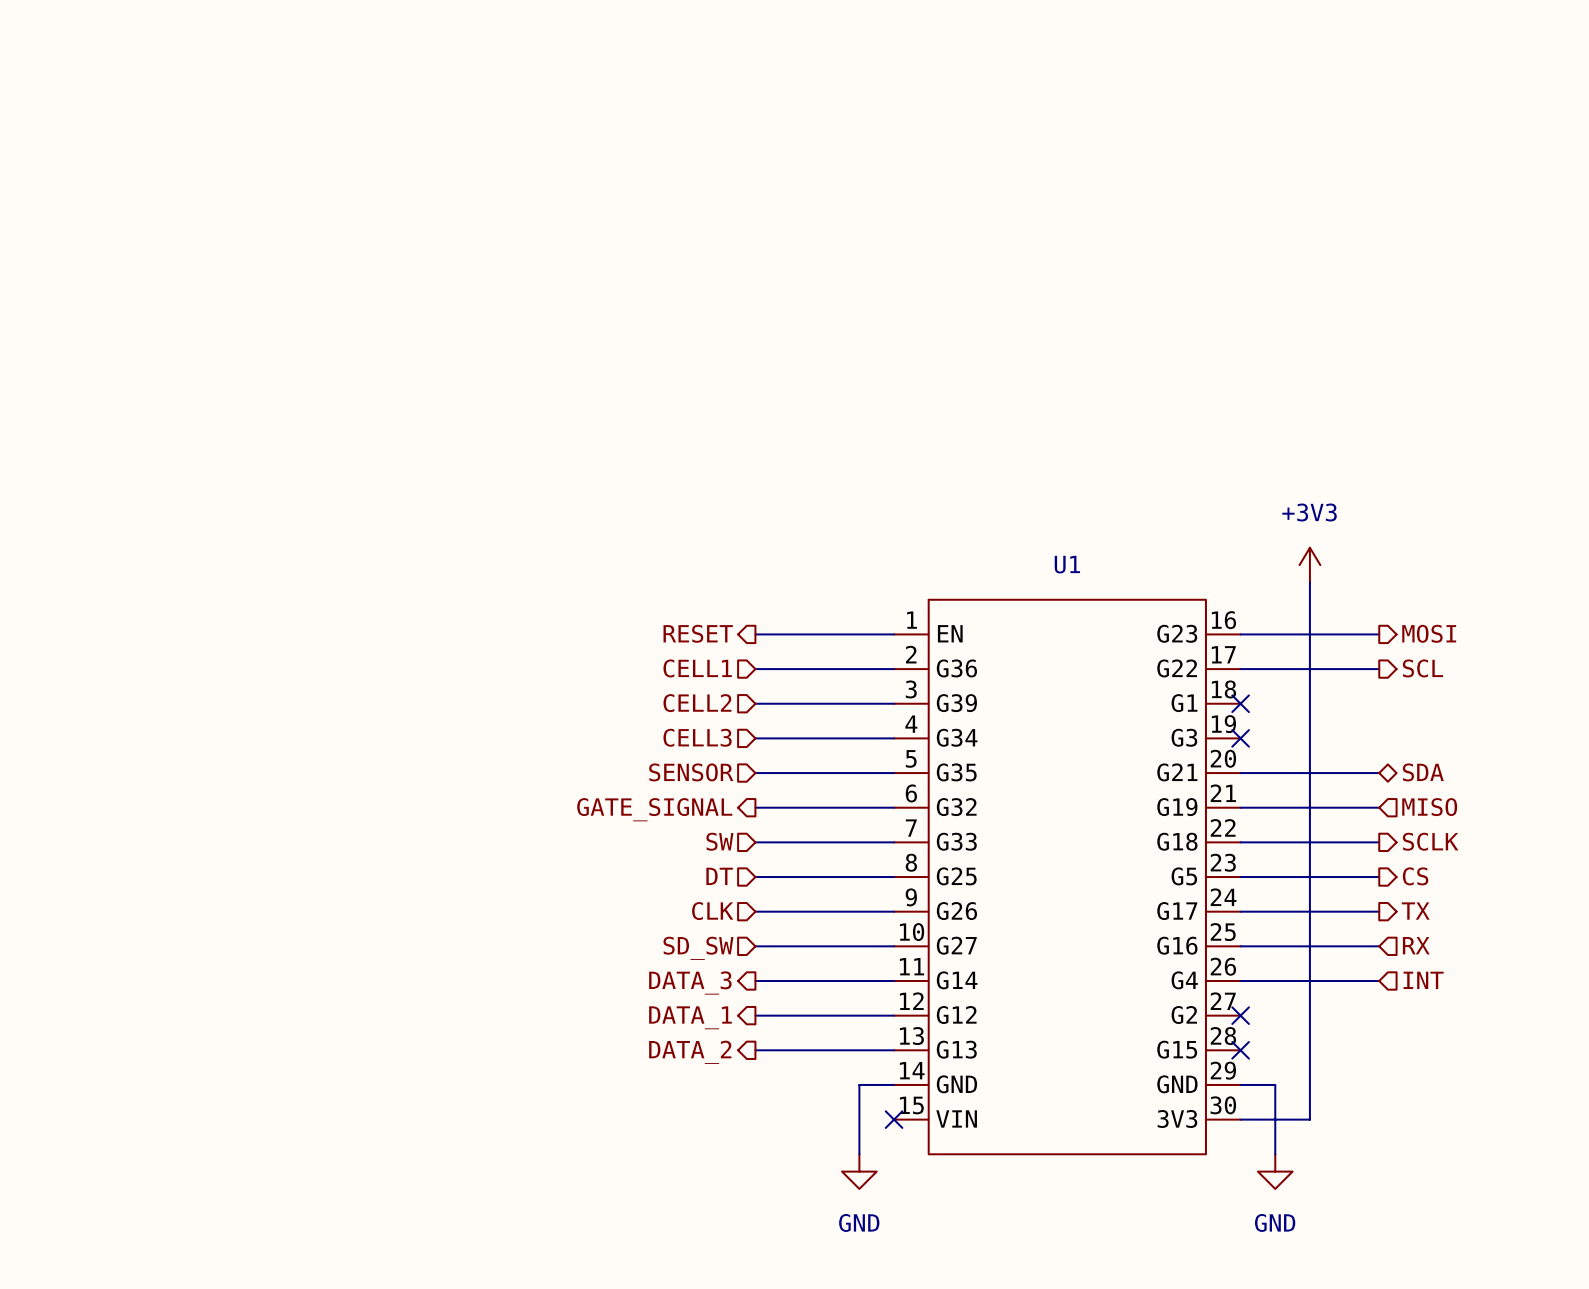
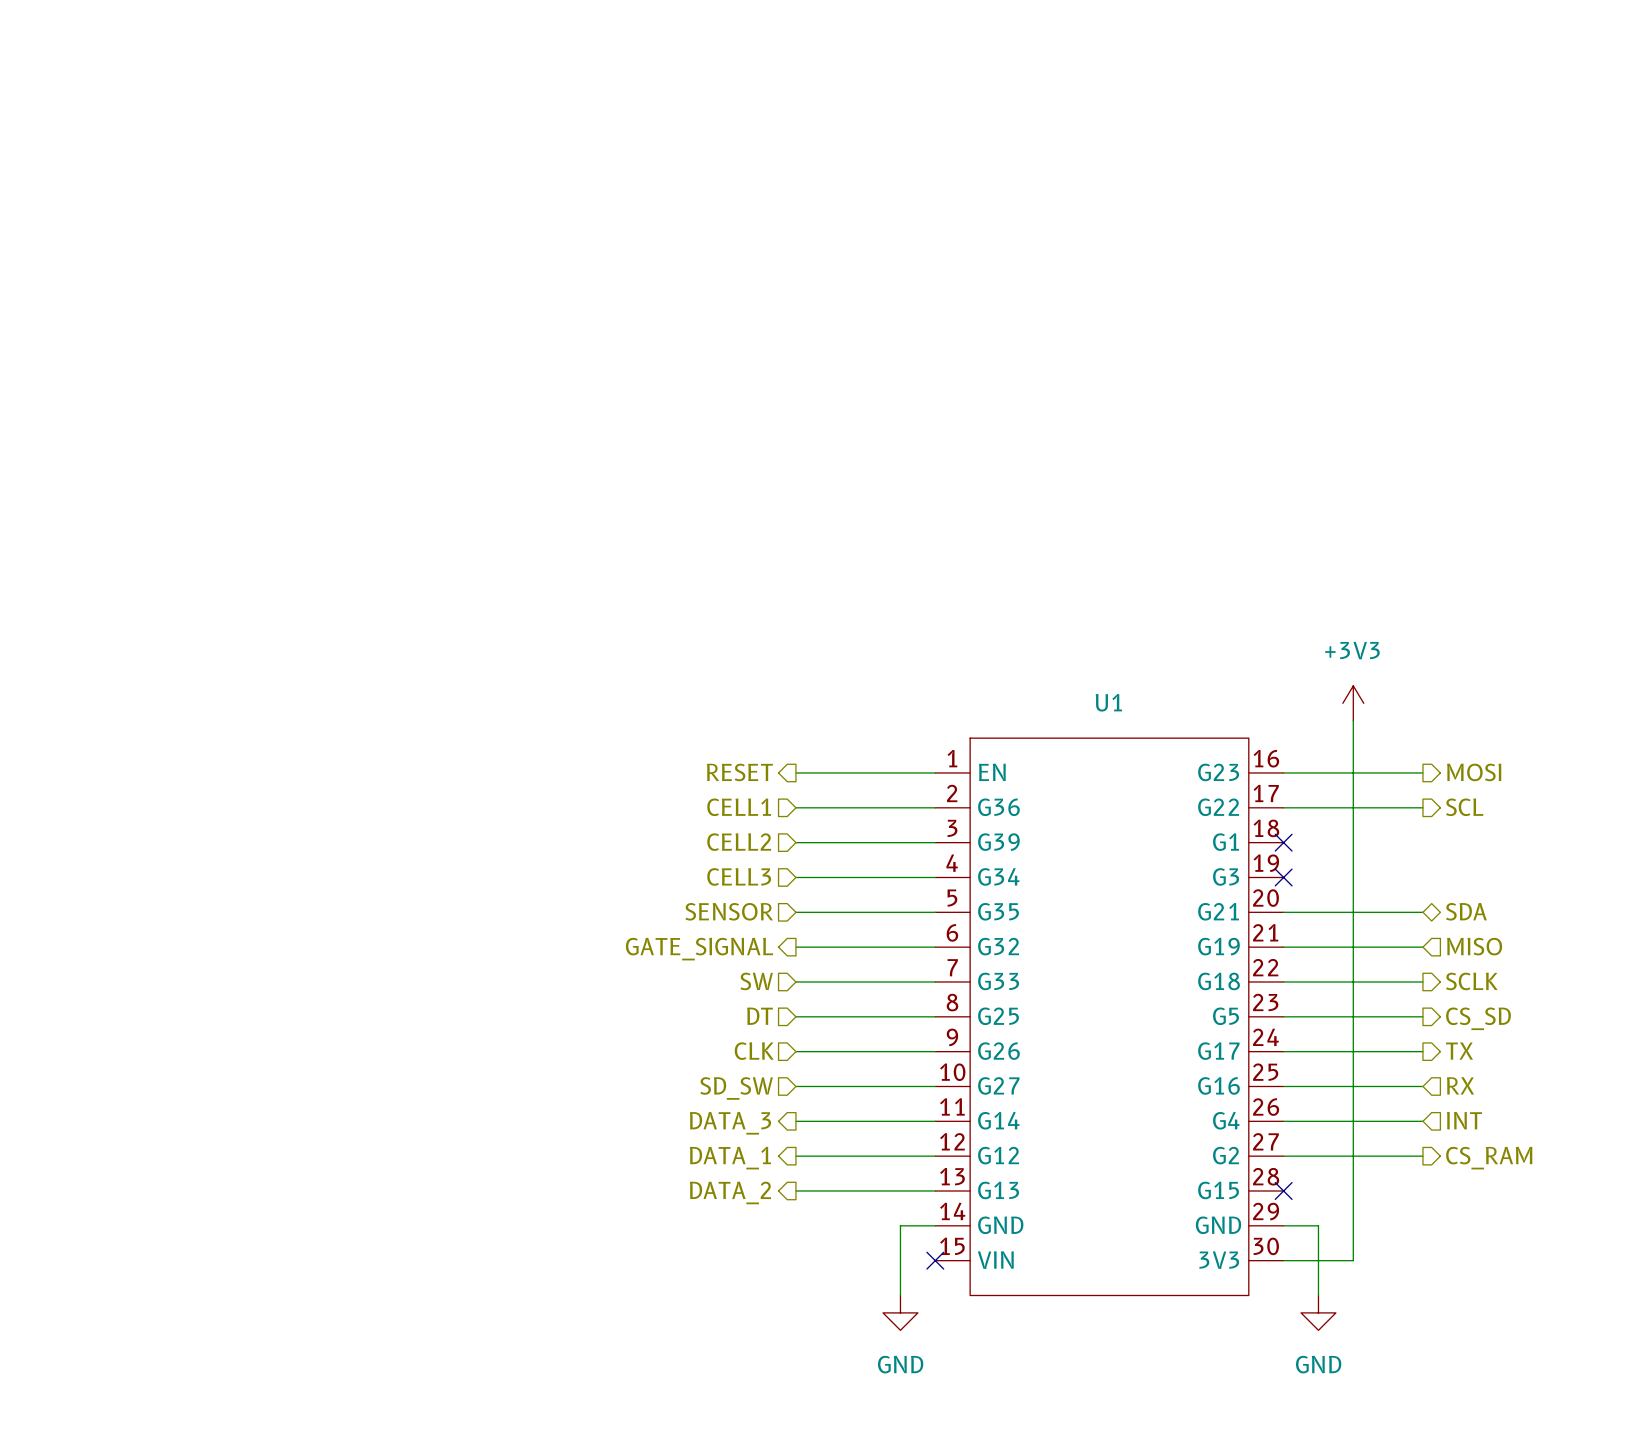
hierarchical label: CS (1415, 876) -> CS_SD (1478, 1018)
wire: none -> (1283, 1156) (1422, 1156)
no-connect mark: (1240, 1015) -> none
hierarchical label: none -> CS_RAM (1489, 1158)

